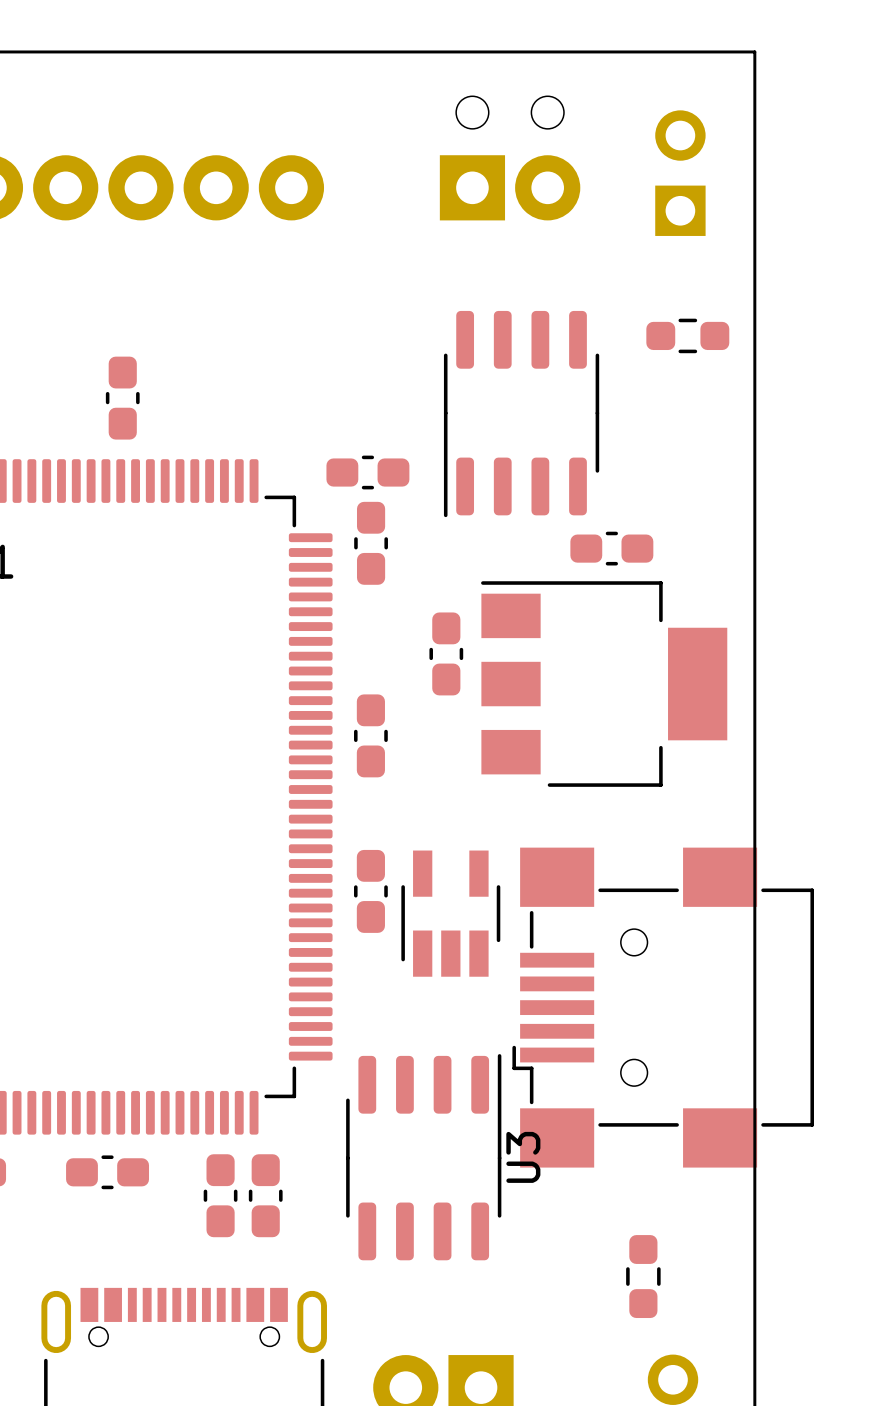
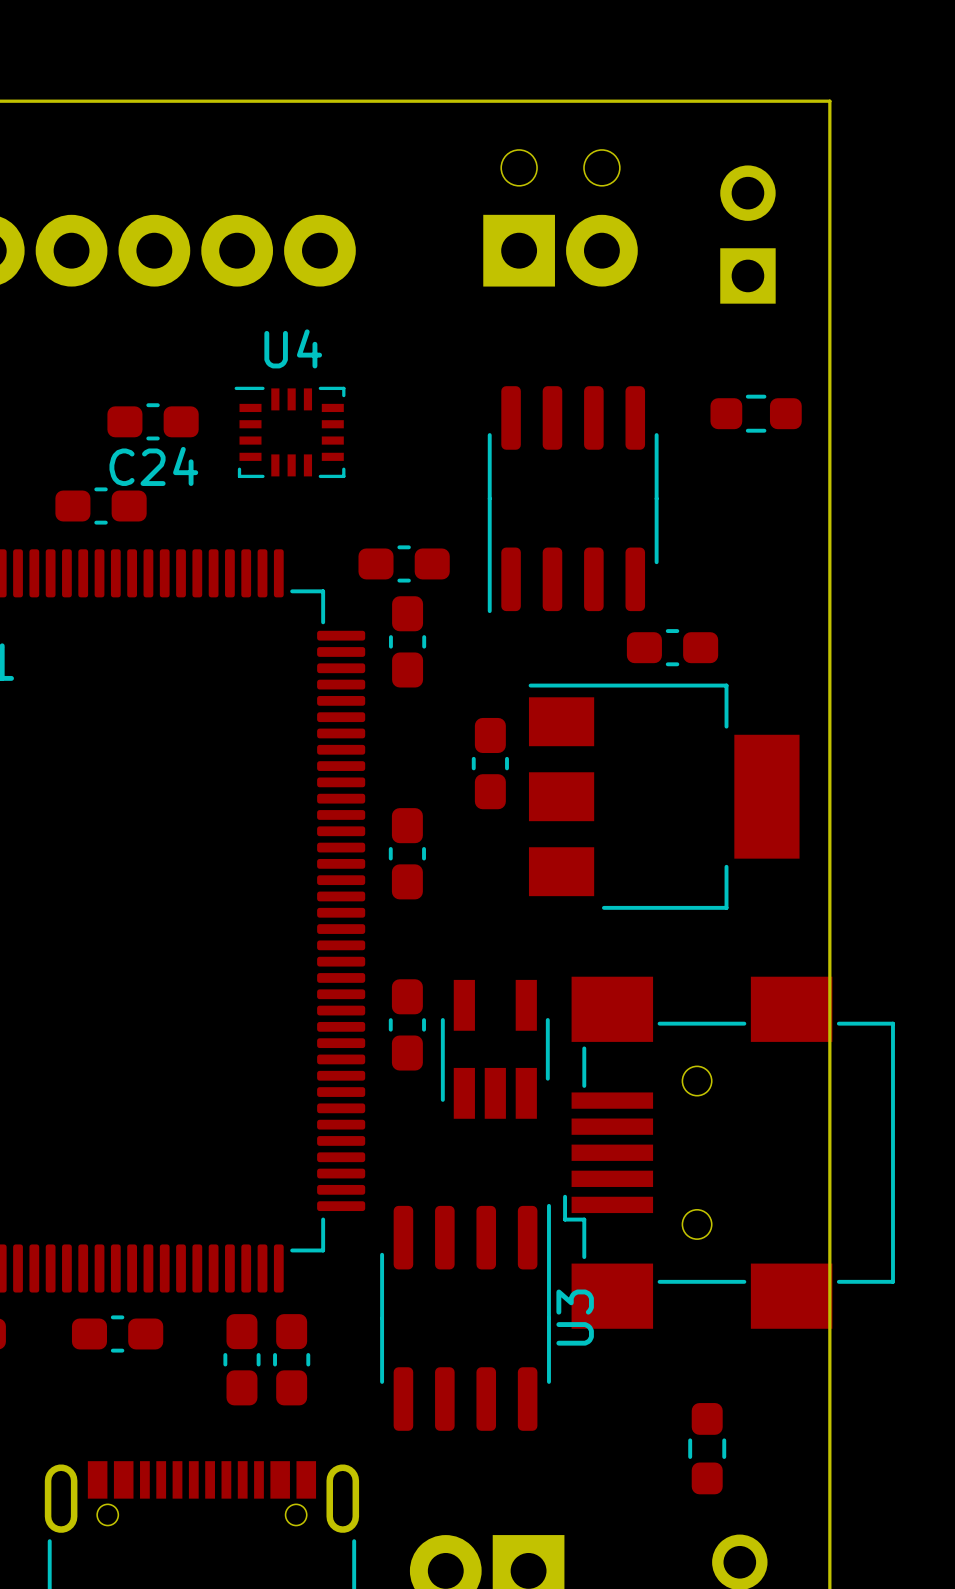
C24: none -> (153, 421)
U4: none -> (290, 432)
part rotation: 0° (122, 398) -> 90° clockwise (101, 506)

